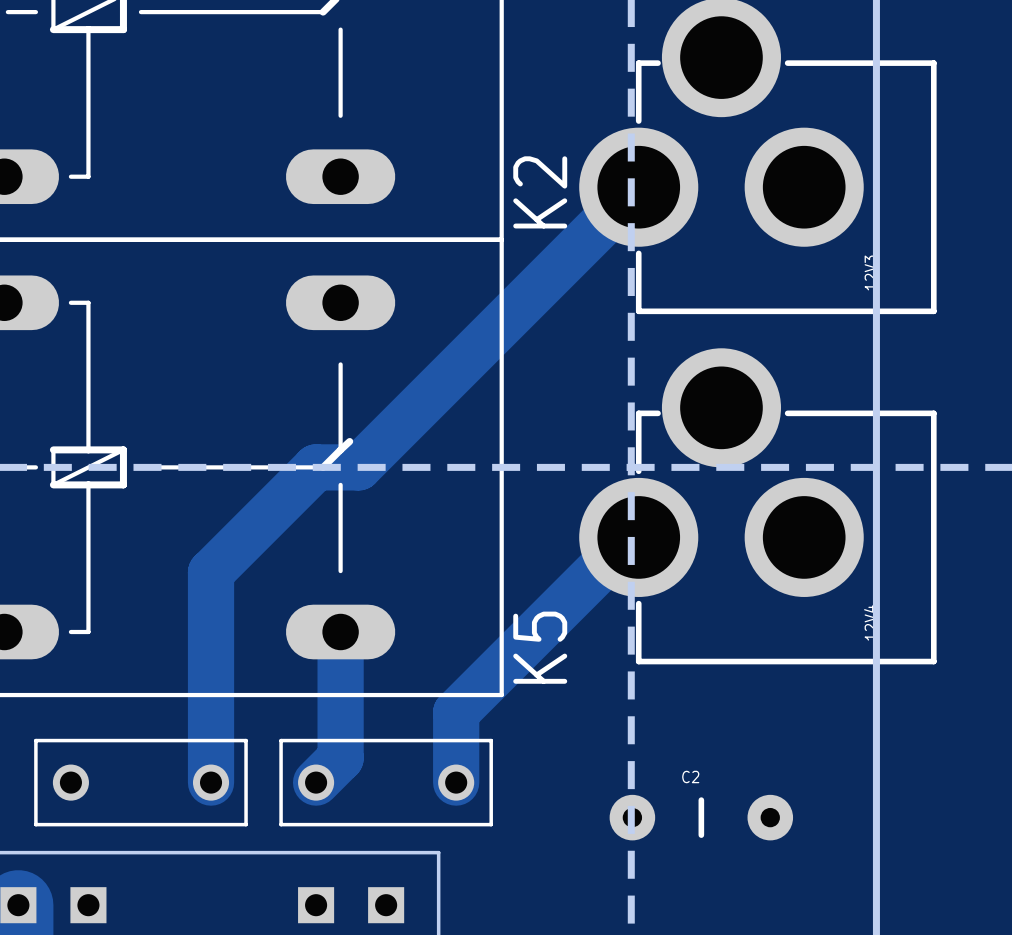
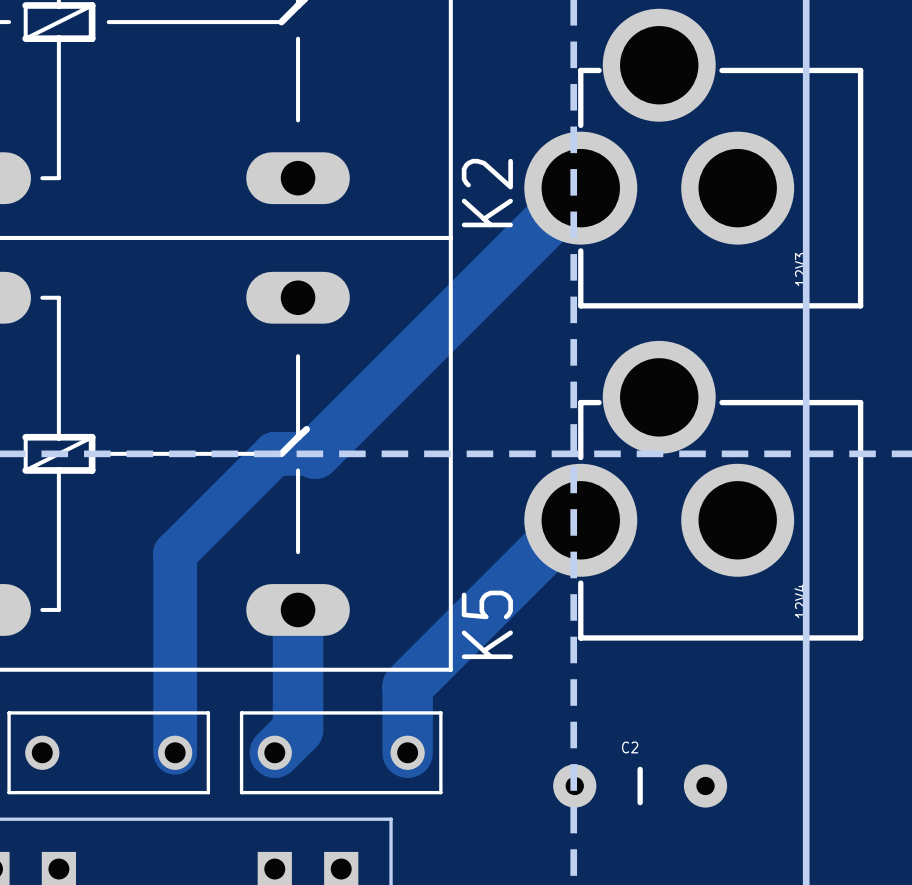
track width: thin (638, 187) (358, 467) -> thick (580, 188) (315, 453)
track width: thin (631, 537) (456, 712) (456, 782) -> thick (573, 520) (407, 686) (407, 752)
track width: thin (340, 632) (340, 758) (316, 782) -> thick (298, 609) (298, 729) (274, 752)

